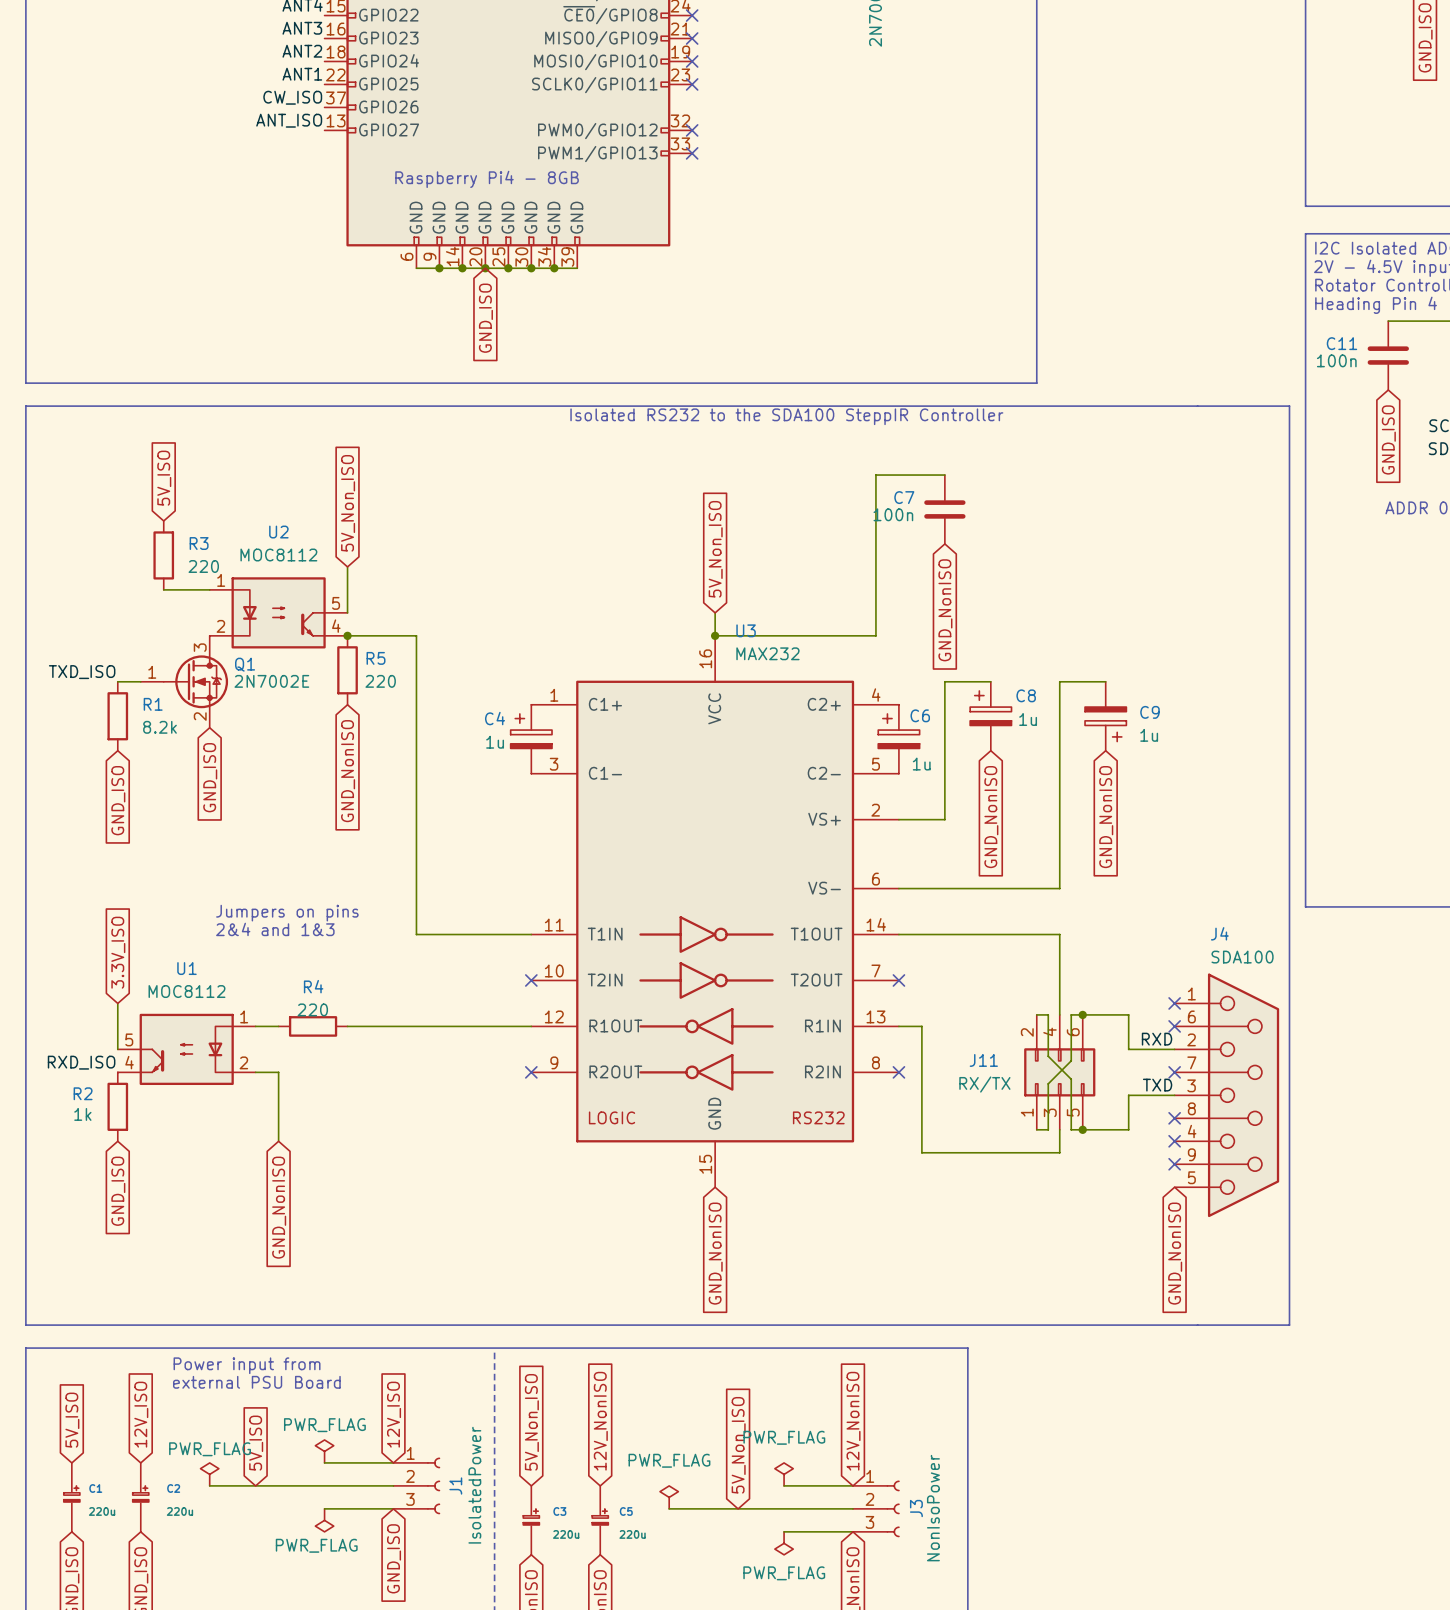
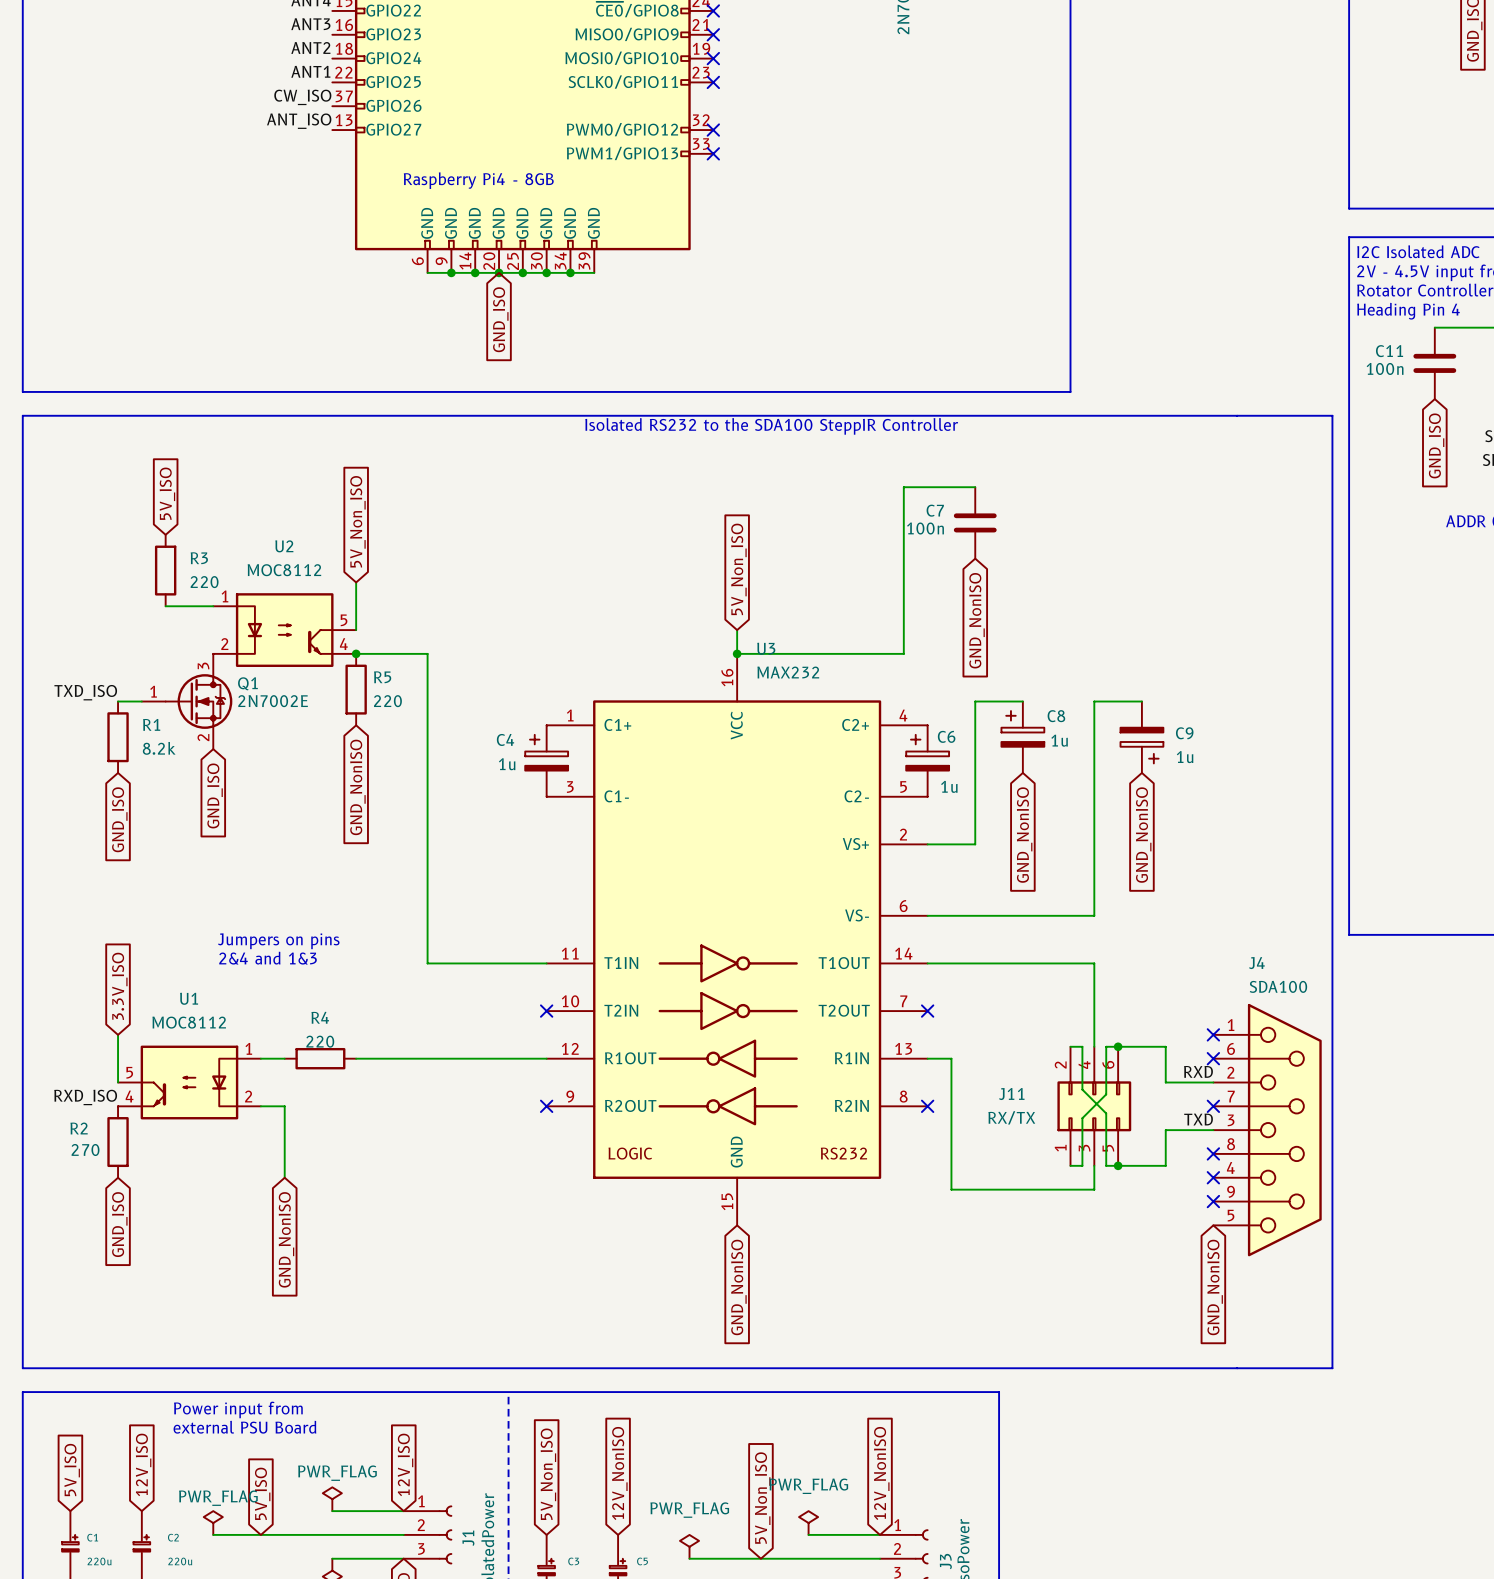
R2 value: 1k (82, 1114) -> 270 (85, 1150)

